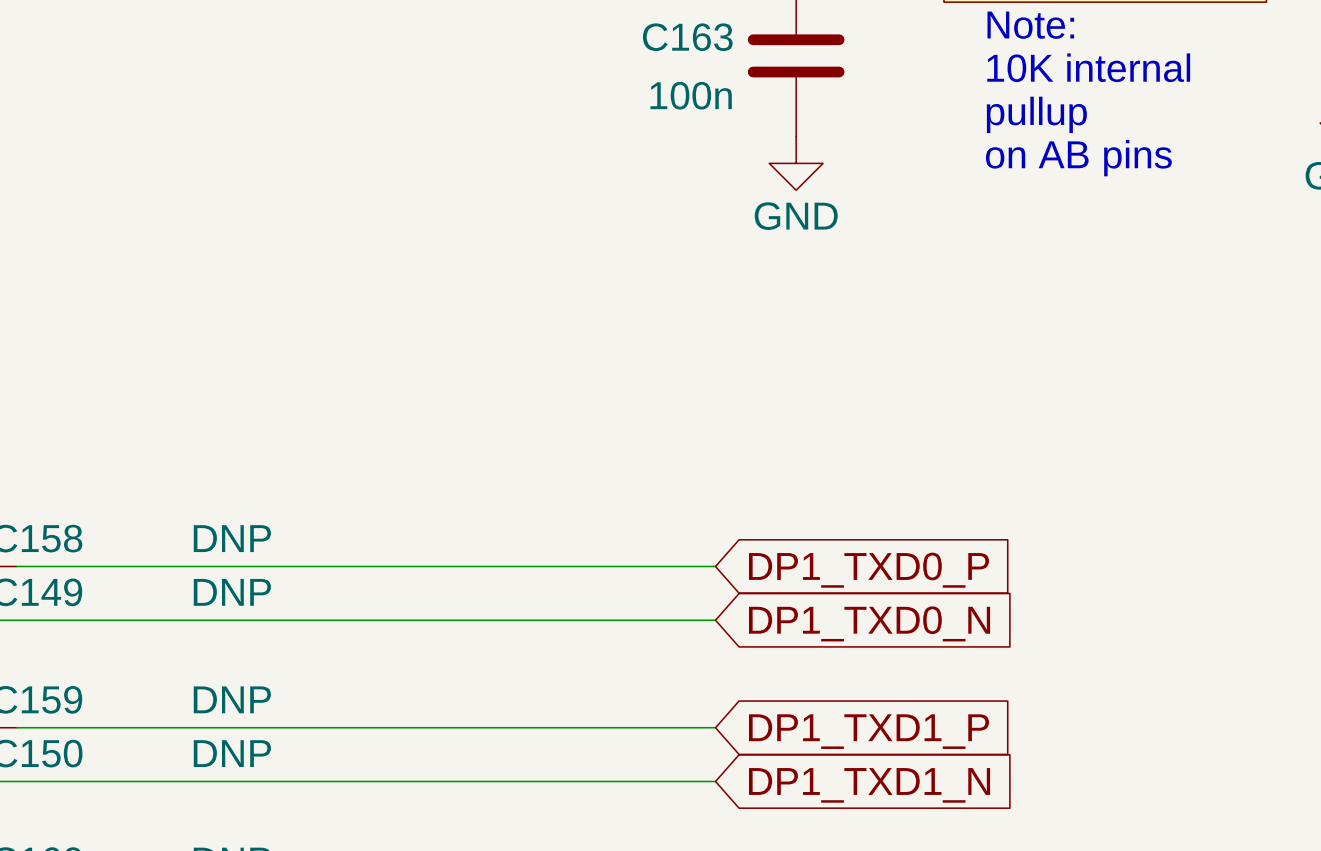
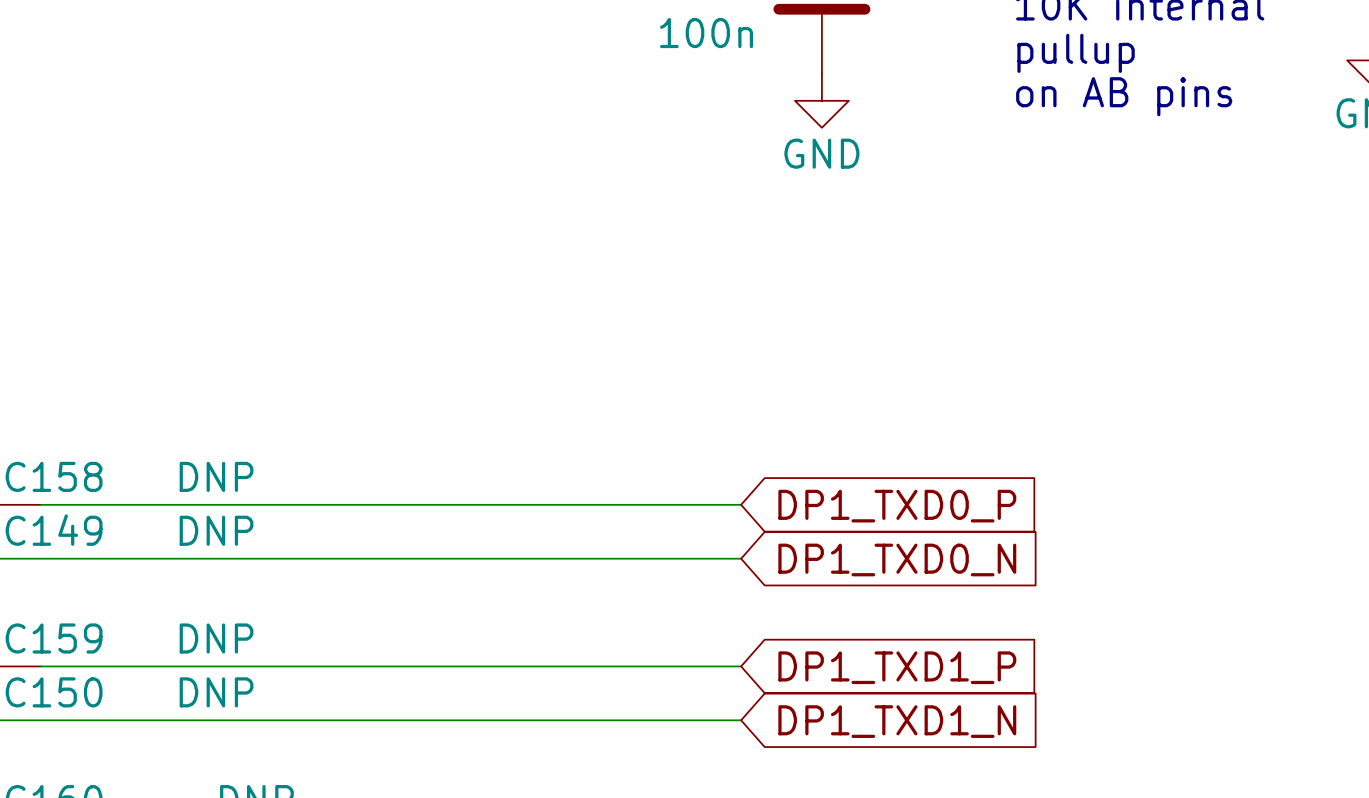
C158 text position: DNP (232, 538) -> DNP (216, 476)
C149 text position: DNP (232, 592) -> DNP (216, 530)
C159 text position: DNP (232, 699) -> DNP (216, 638)
C150 text position: DNP (232, 753) -> DNP (216, 692)

